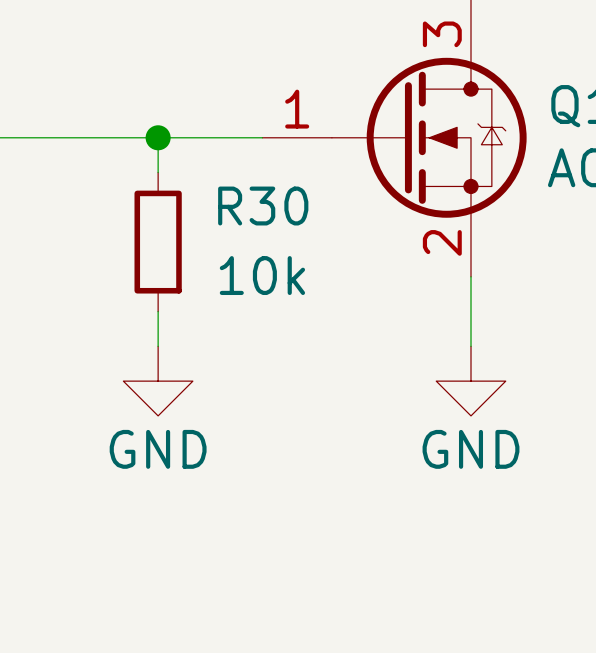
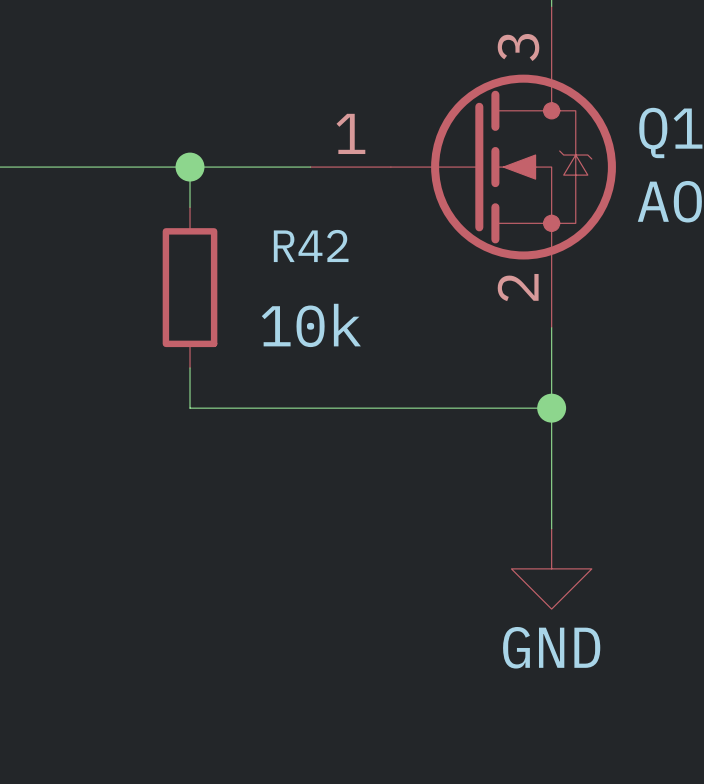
R30 name: R30 (263, 206) -> R42 (311, 245)
wire: none -> (190, 408) (551, 408) (551, 528)
junction: none -> (551, 408)
power symbol: GND (158, 381) -> none
power symbol position: GND (471, 381) -> GND (551, 568)

